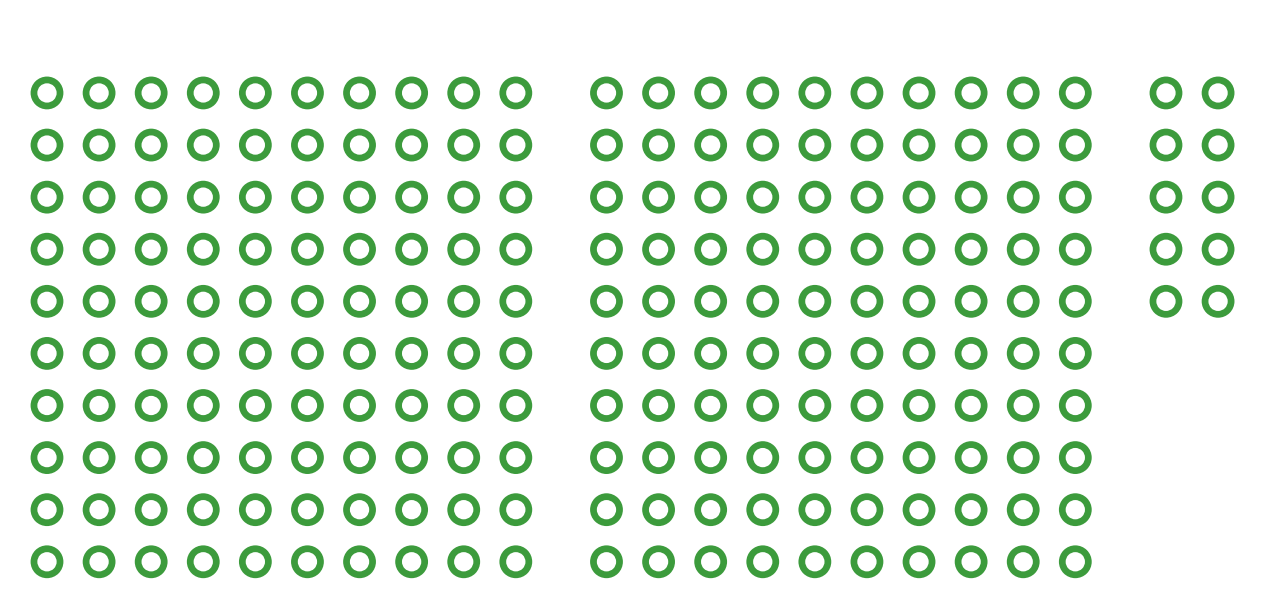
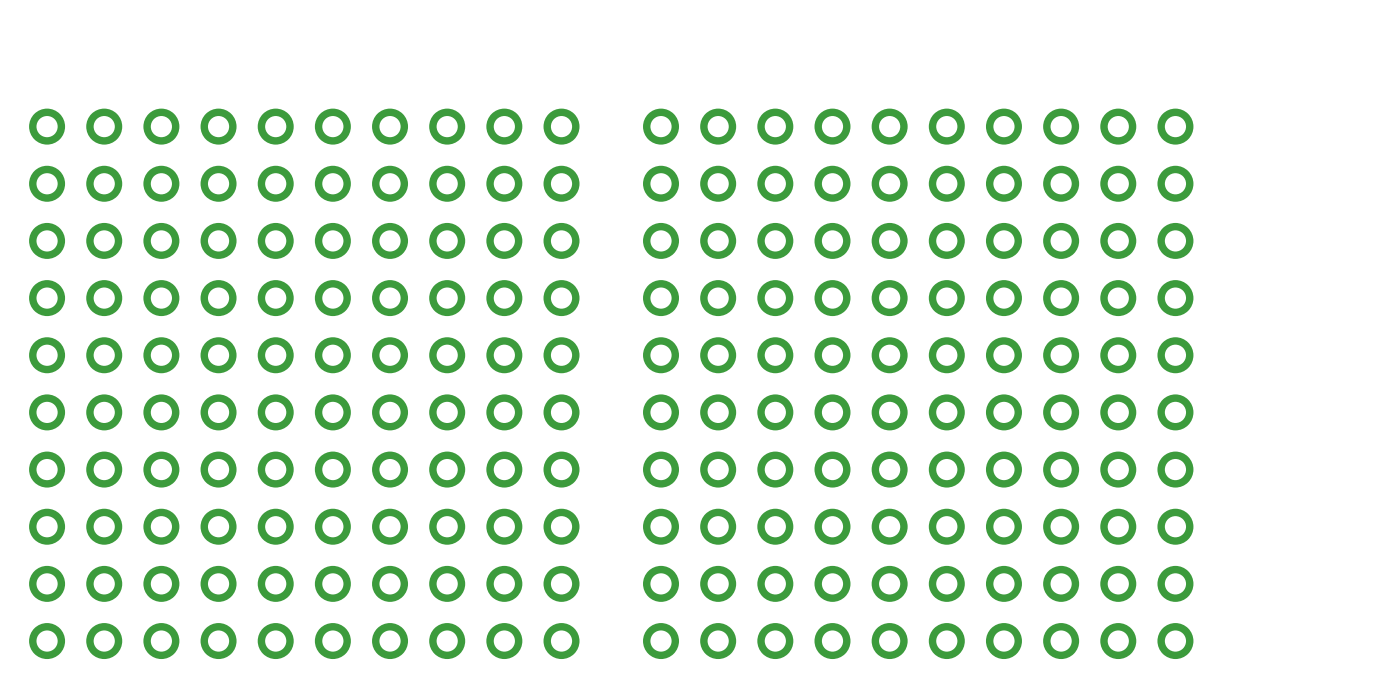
part: (1165, 92) -> none
part: (1218, 92) -> none
part: (1165, 145) -> none
part: (1218, 145) -> none
part: (1165, 197) -> none
part: (1218, 197) -> none
part: (1165, 249) -> none
part: (1218, 249) -> none
part: (1165, 301) -> none
part: (1218, 301) -> none

